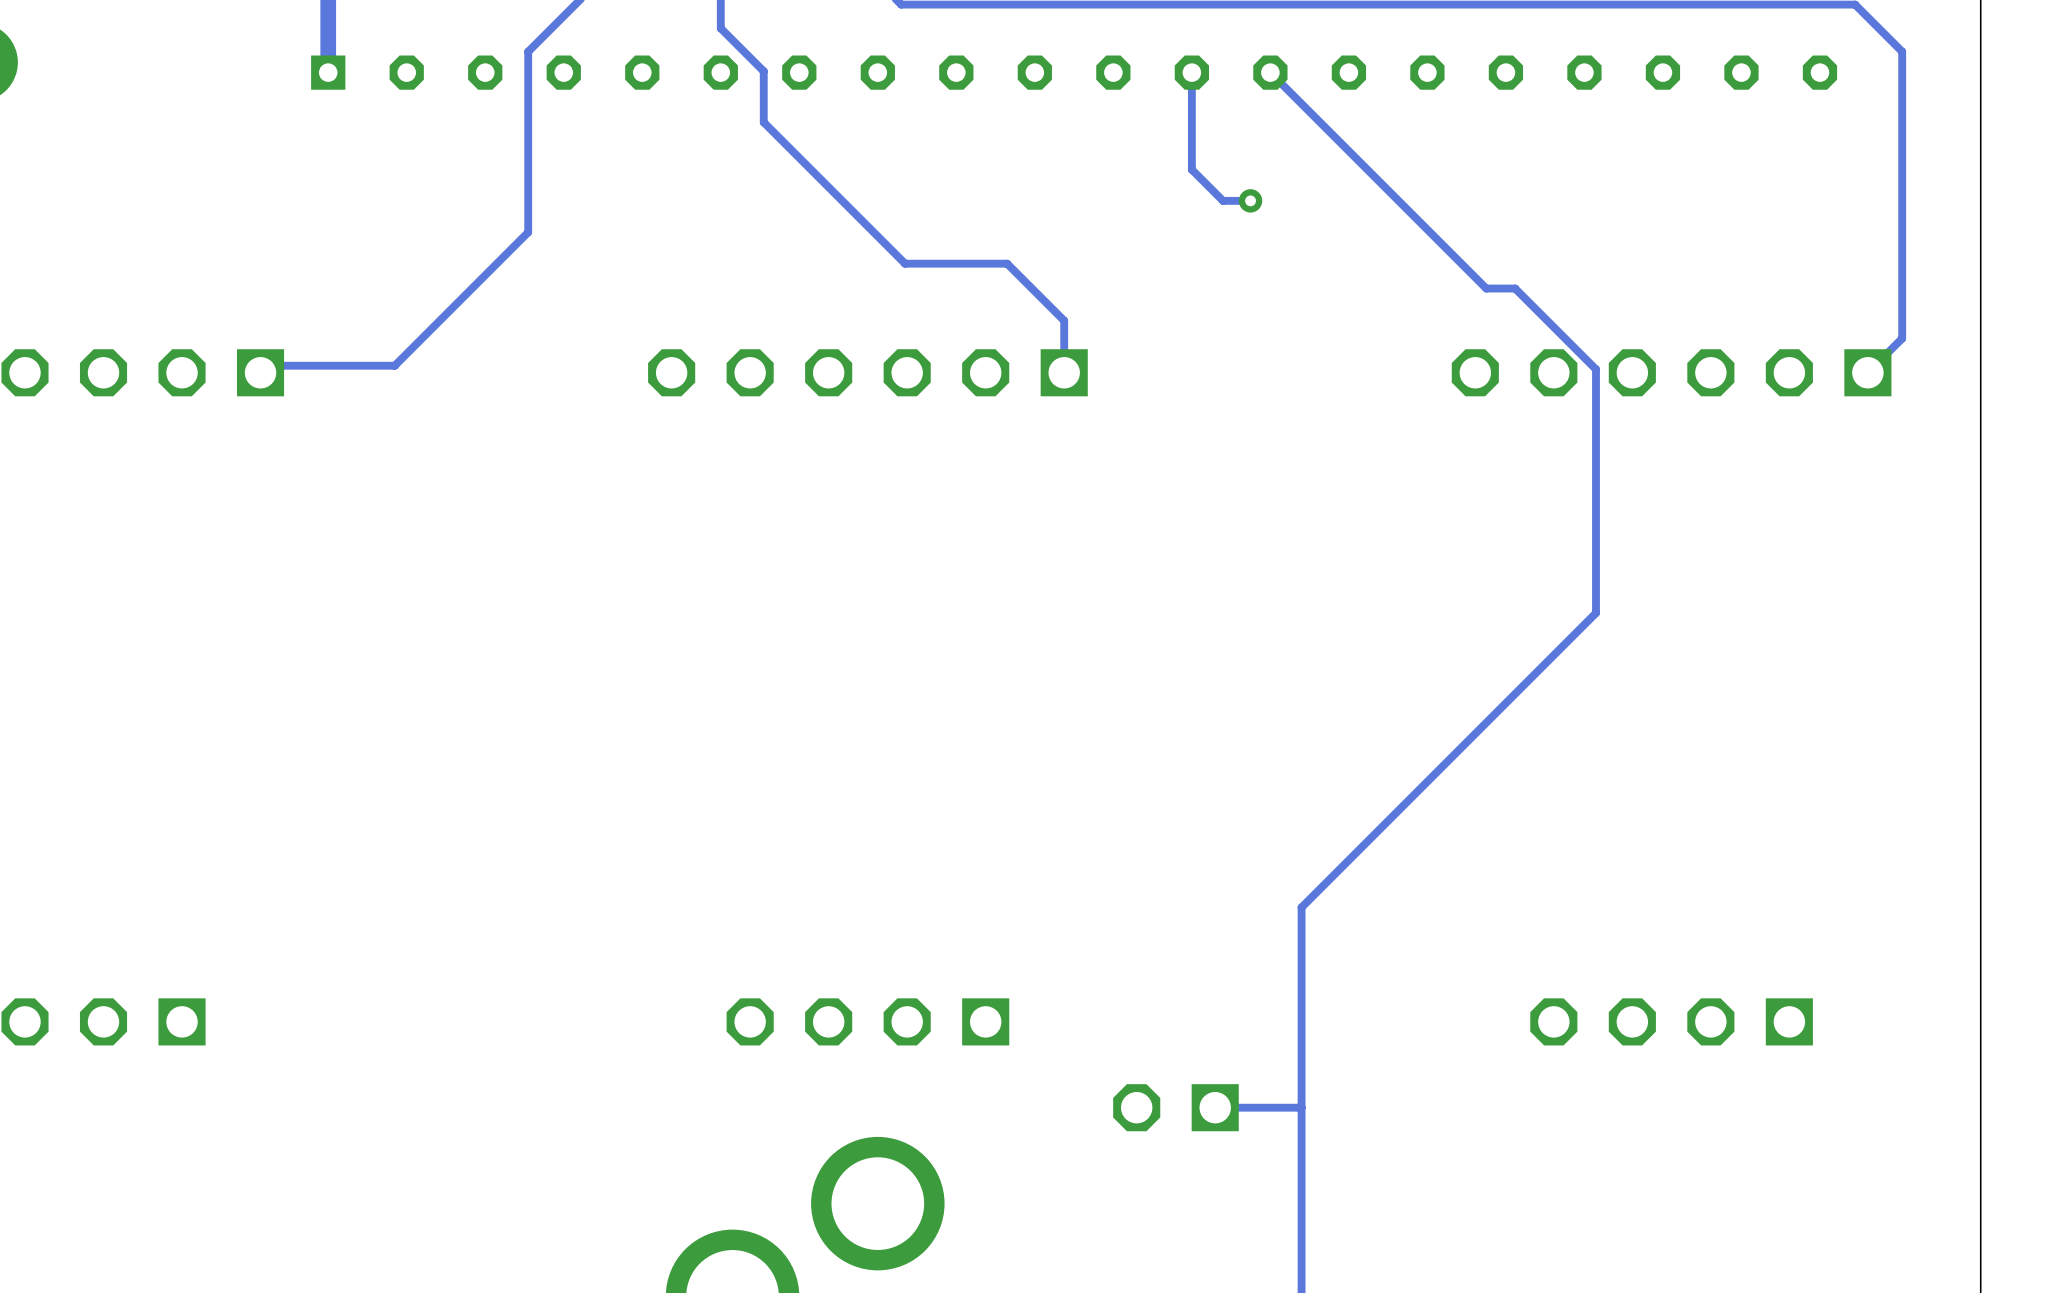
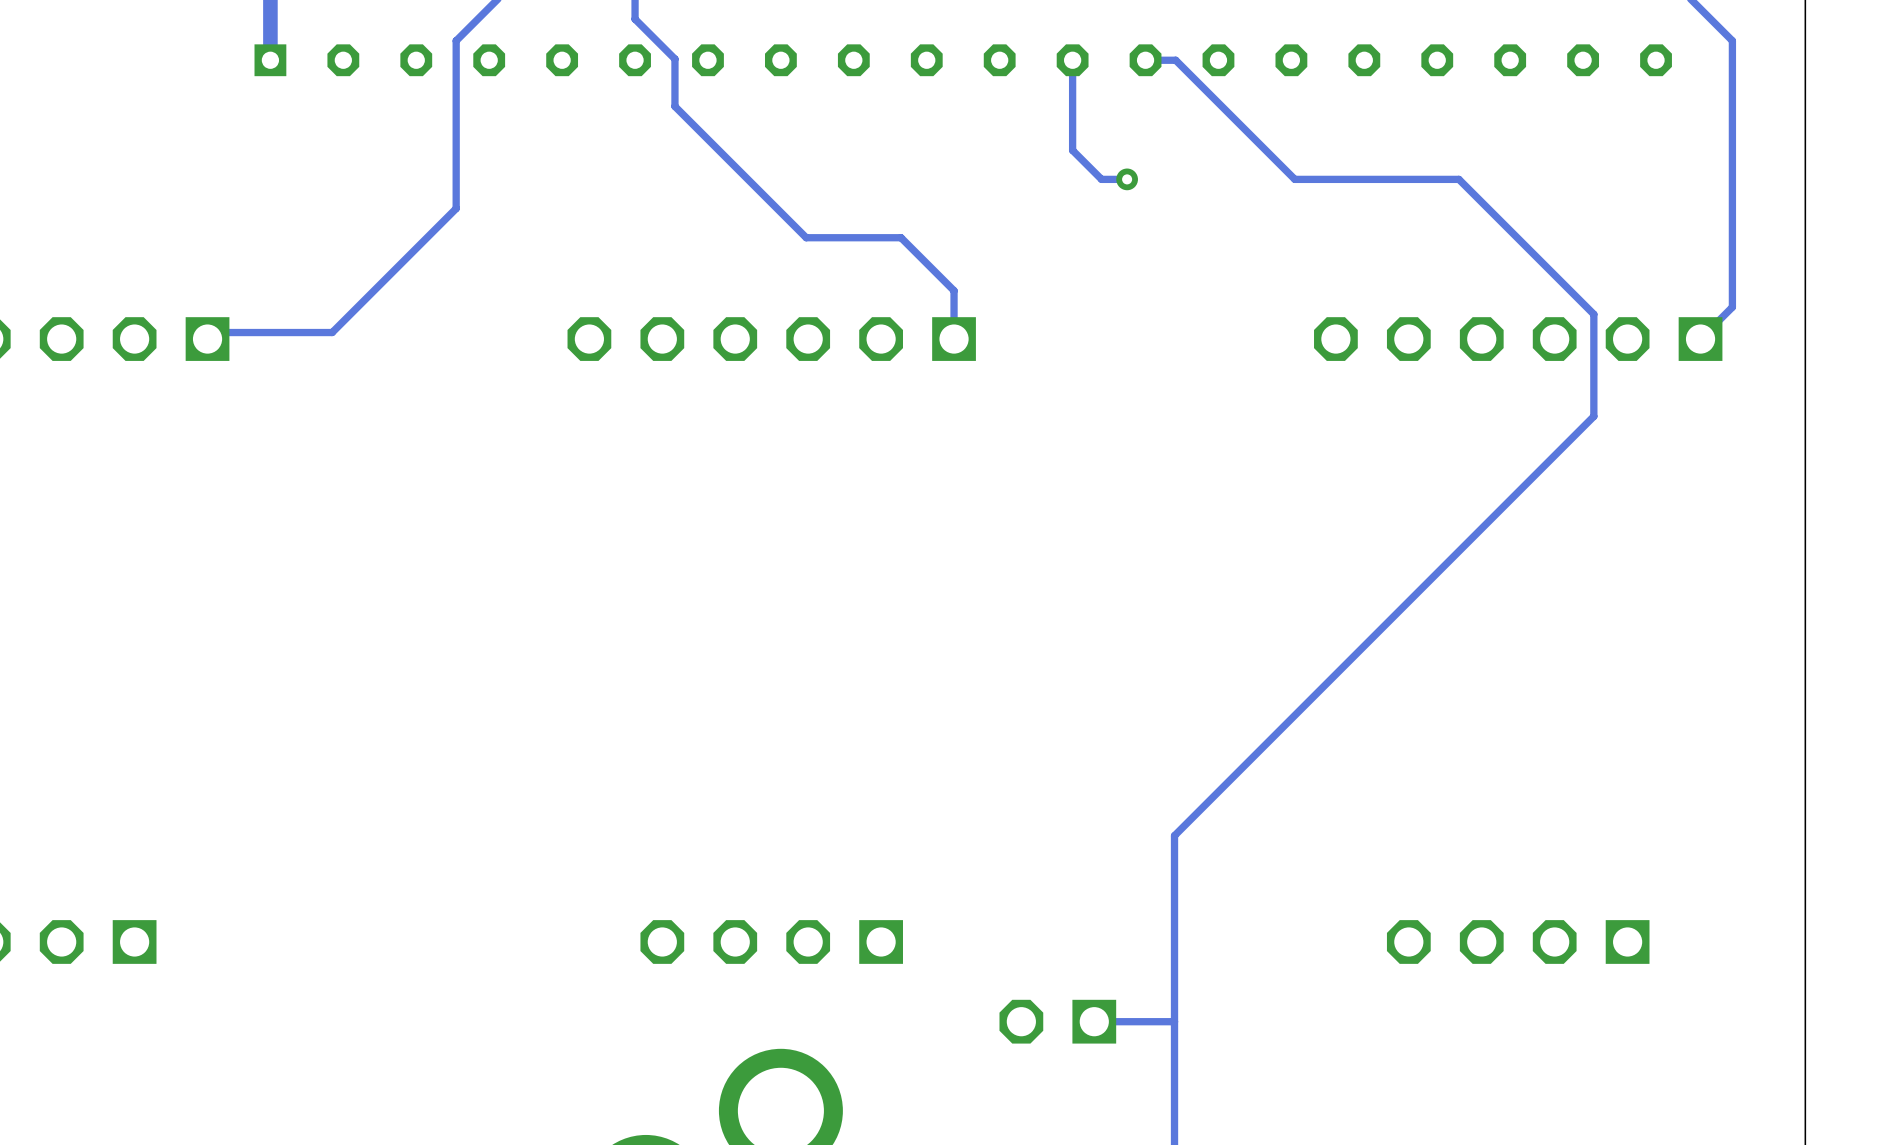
track: (1270, 72) (1486, 288) (1515, 288) (1596, 369) (1596, 613) -> (1145, 60) (1175, 60) (1294, 179) (1458, 179) (1593, 314) (1593, 416) (1447, 562)

